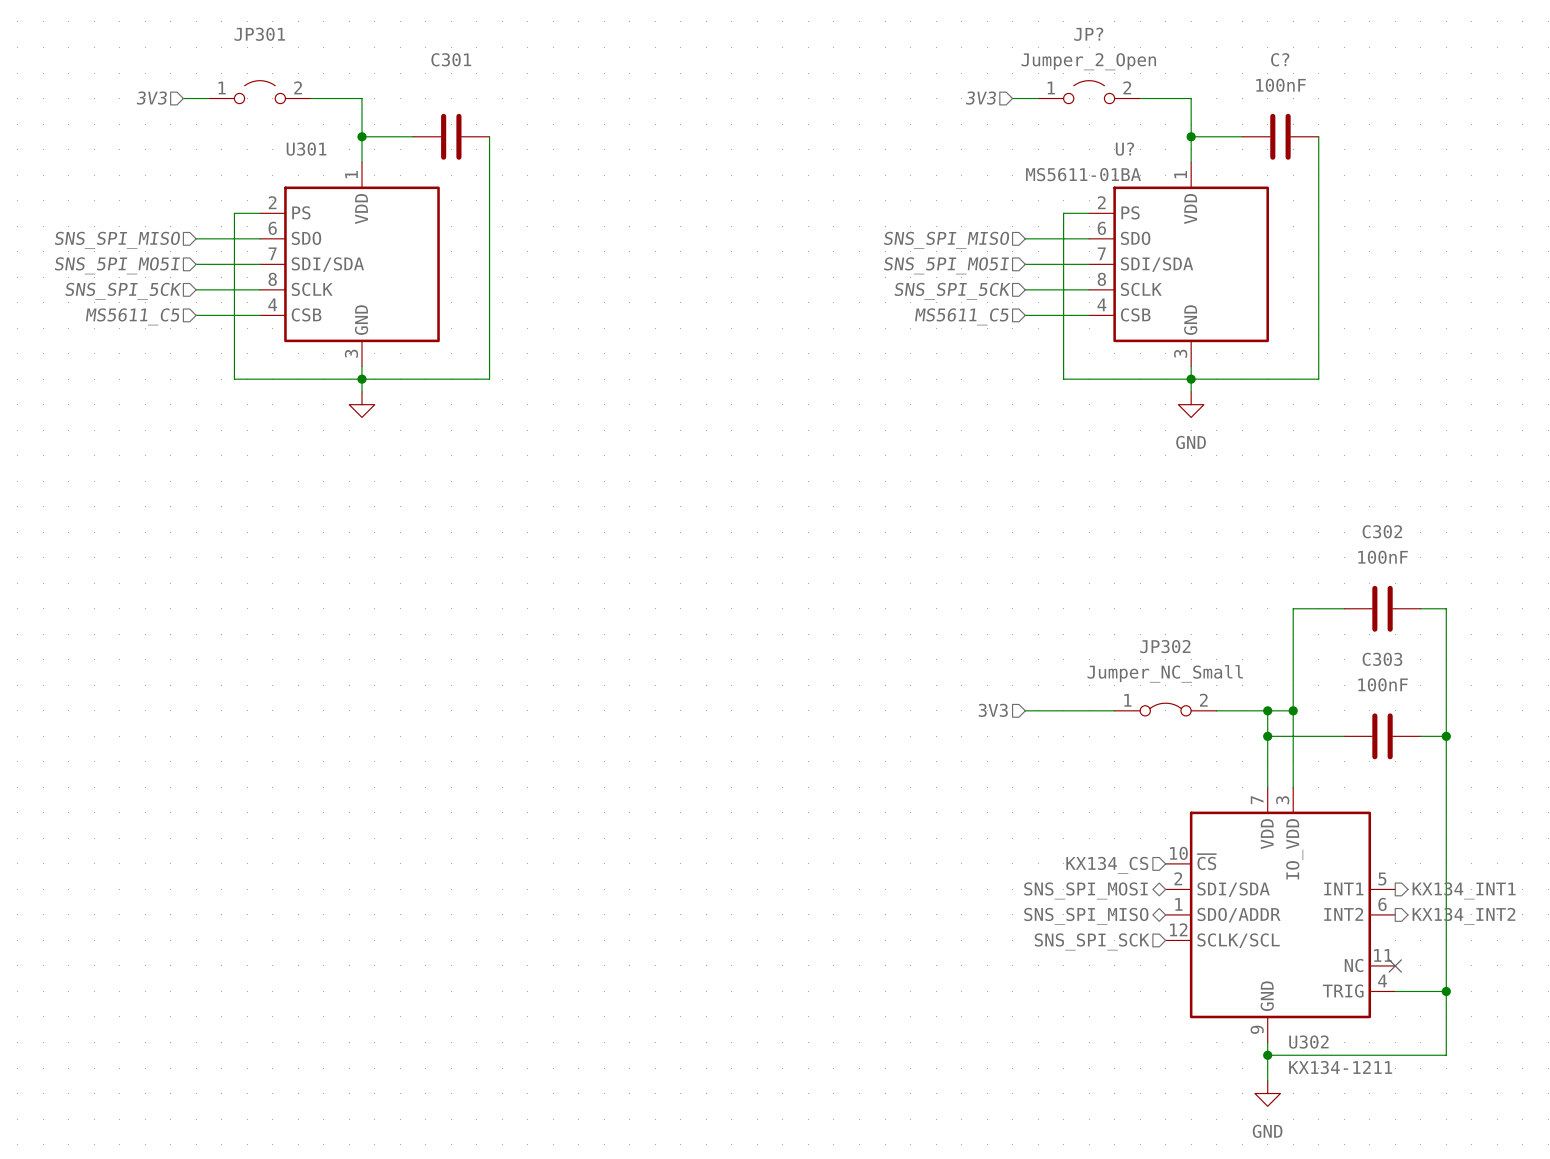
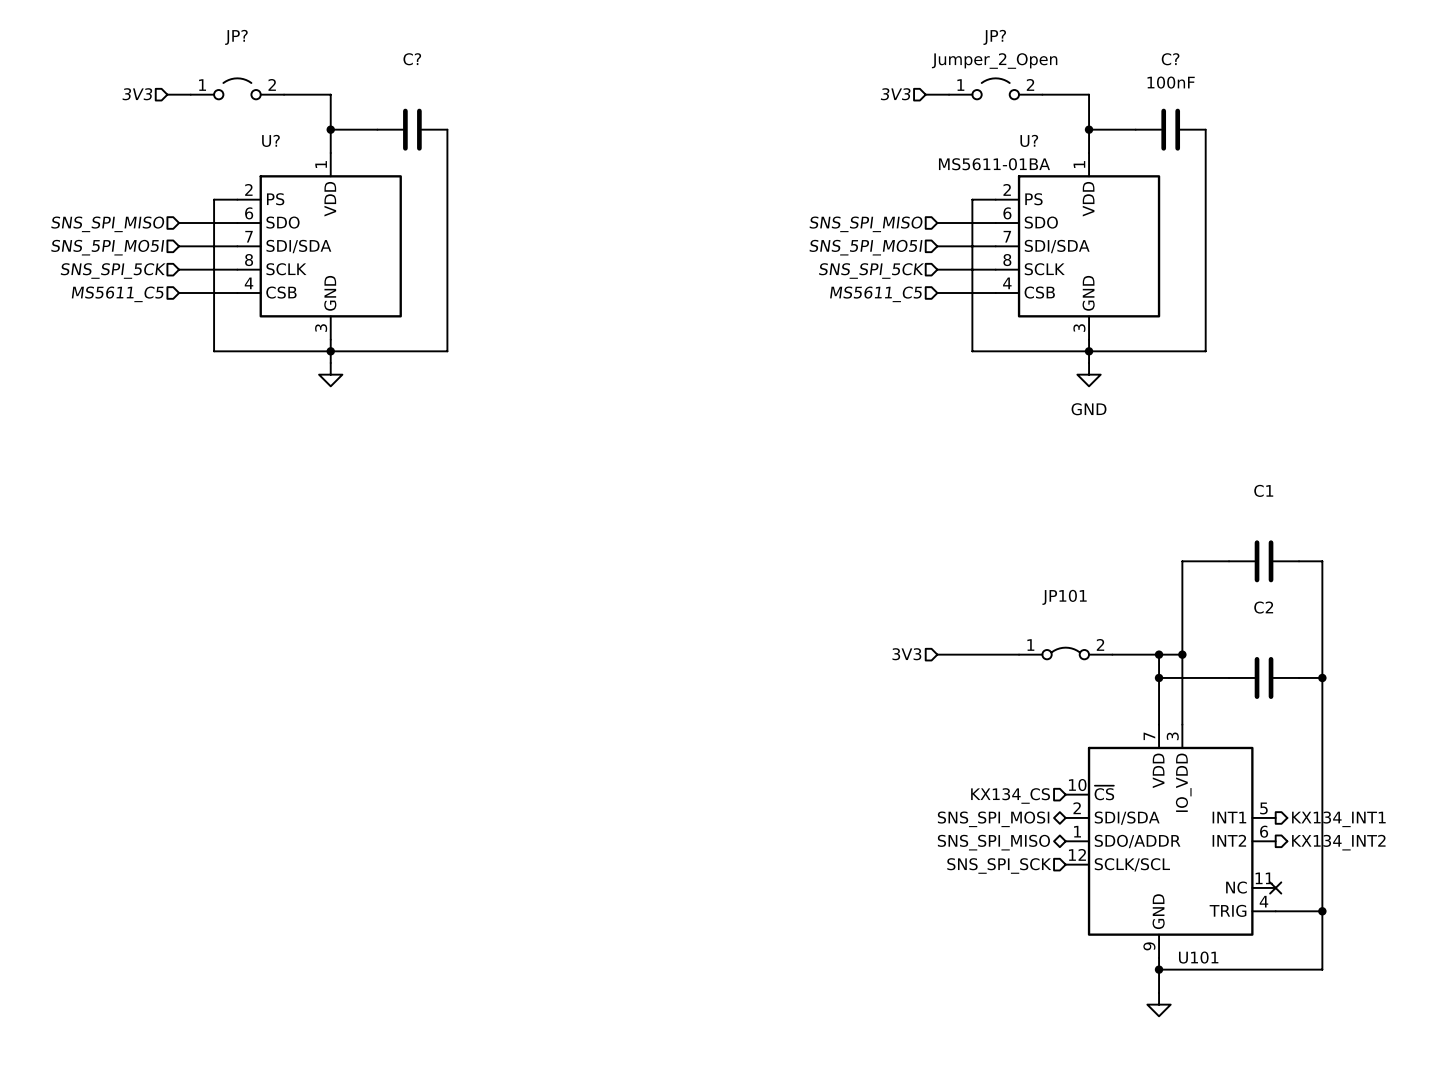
JP301 name: JP301 (259, 34) -> JP? (236, 37)
C301 name: C301 (451, 59) -> C? (412, 59)
U301 name: U301 (306, 149) -> U? (270, 140)
C302 name: C302 (1382, 531) -> C1 (1263, 490)
C302 value: 100nF (1383, 557) -> none
JP302 name: JP302 (1165, 646) -> JP101 (1064, 597)
C303 name: C303 (1382, 659) -> C2 (1263, 607)
JP302 value: Jumper_NC_Small (1165, 673) -> none
C303 value: 100nF (1383, 684) -> none
U302 name: U302 (1308, 1042) -> U101 (1198, 957)
U302 value: KX134-1211 (1340, 1067) -> none
power symbol text: GND (1267, 1131) -> none

